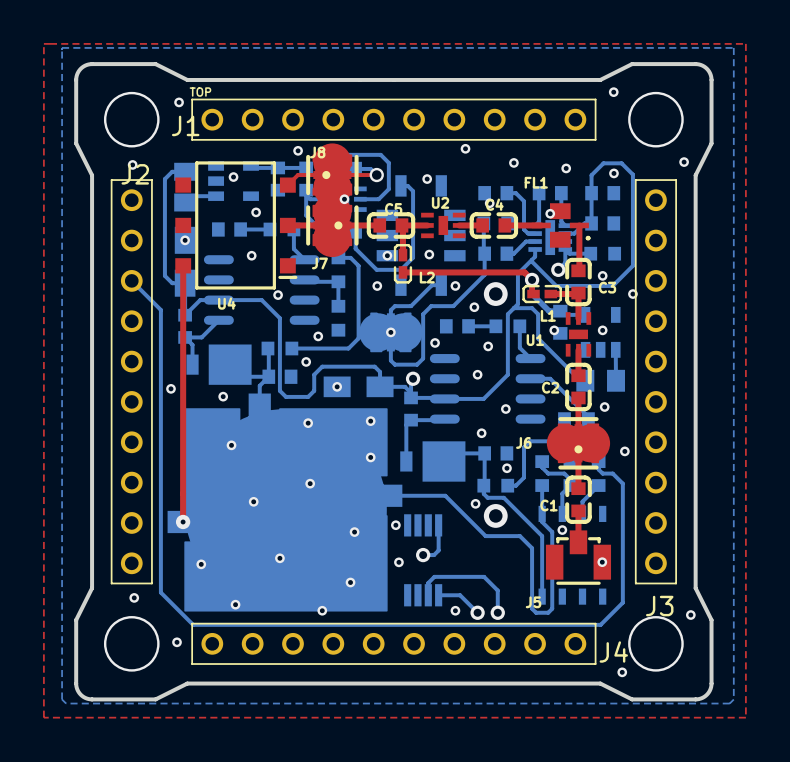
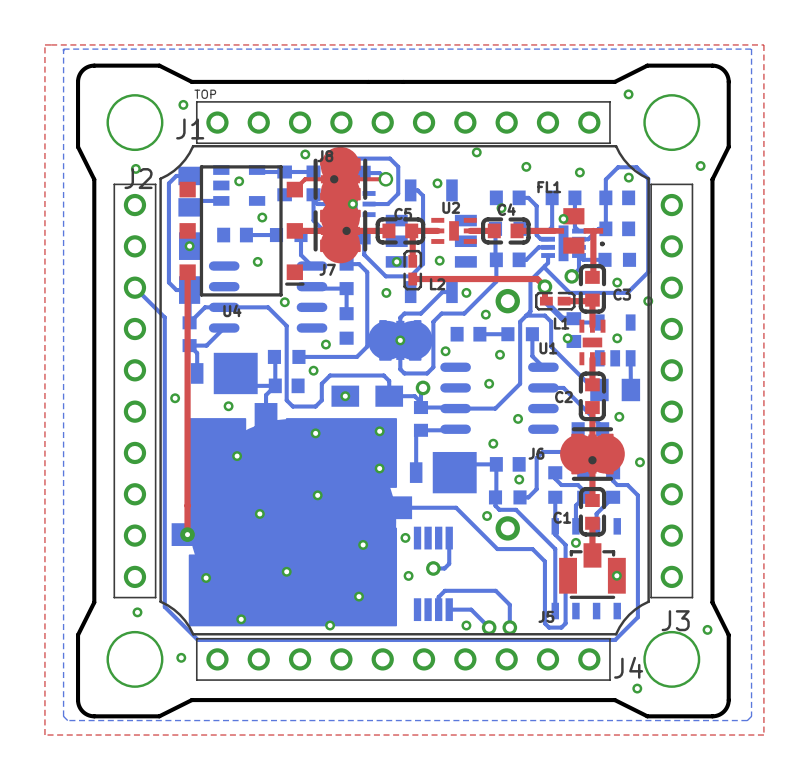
line: none -> (193, 146) (616, 146) (629, 165) (648, 178) (648, 601) (629, 614) (616, 634) (193, 634) (180, 614) (160, 601) (160, 178) (180, 165) (193, 146)

